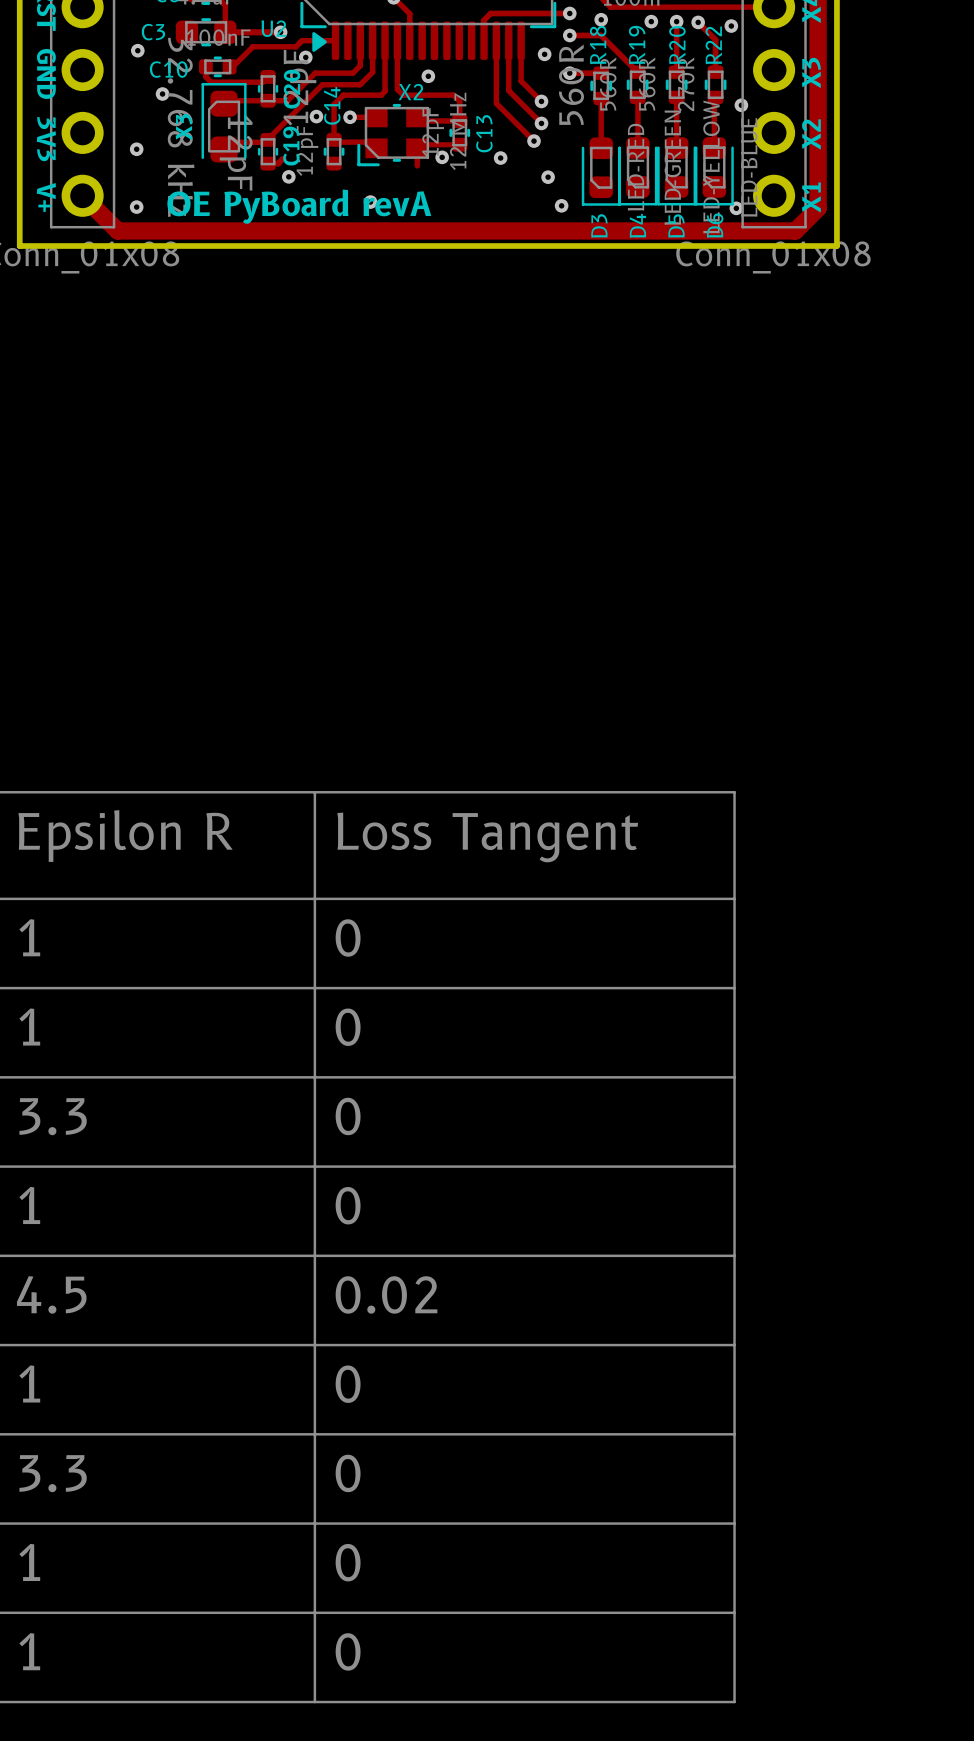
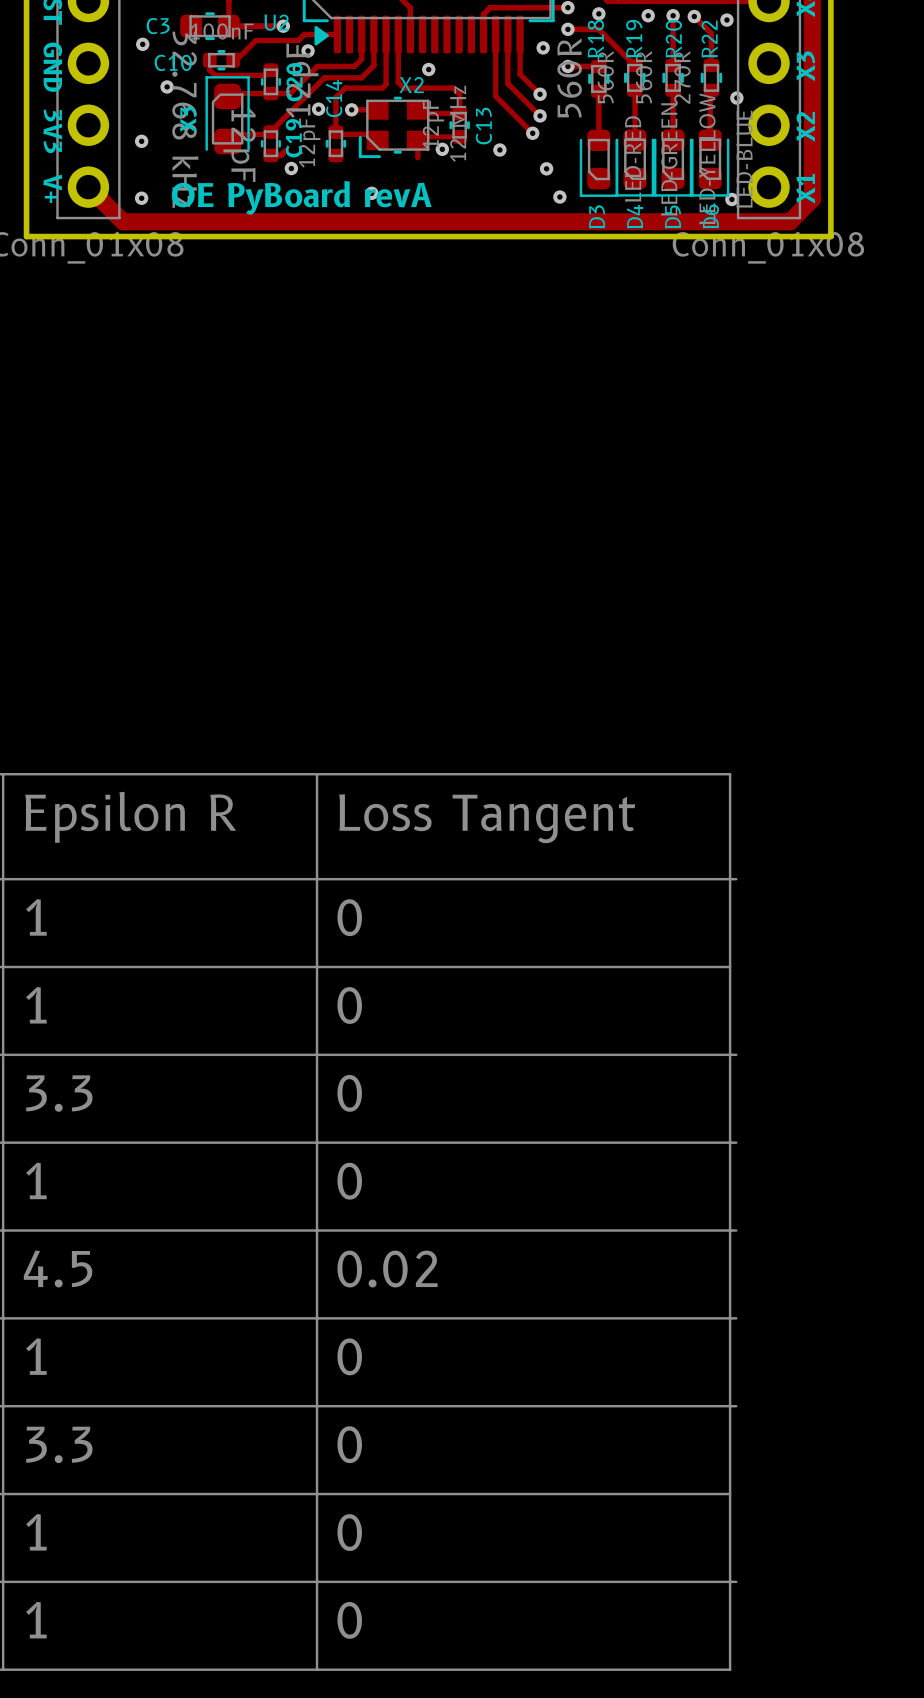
line: none -> (730, 879) (736, 879)
line: none -> (730, 1054) (736, 1054)
line: none -> (730, 1142) (736, 1142)
line: none -> (730, 1230) (736, 1230)
line: none -> (730, 1318) (736, 1318)
line: none -> (730, 1406) (736, 1406)
line: none -> (730, 1581) (736, 1581)

